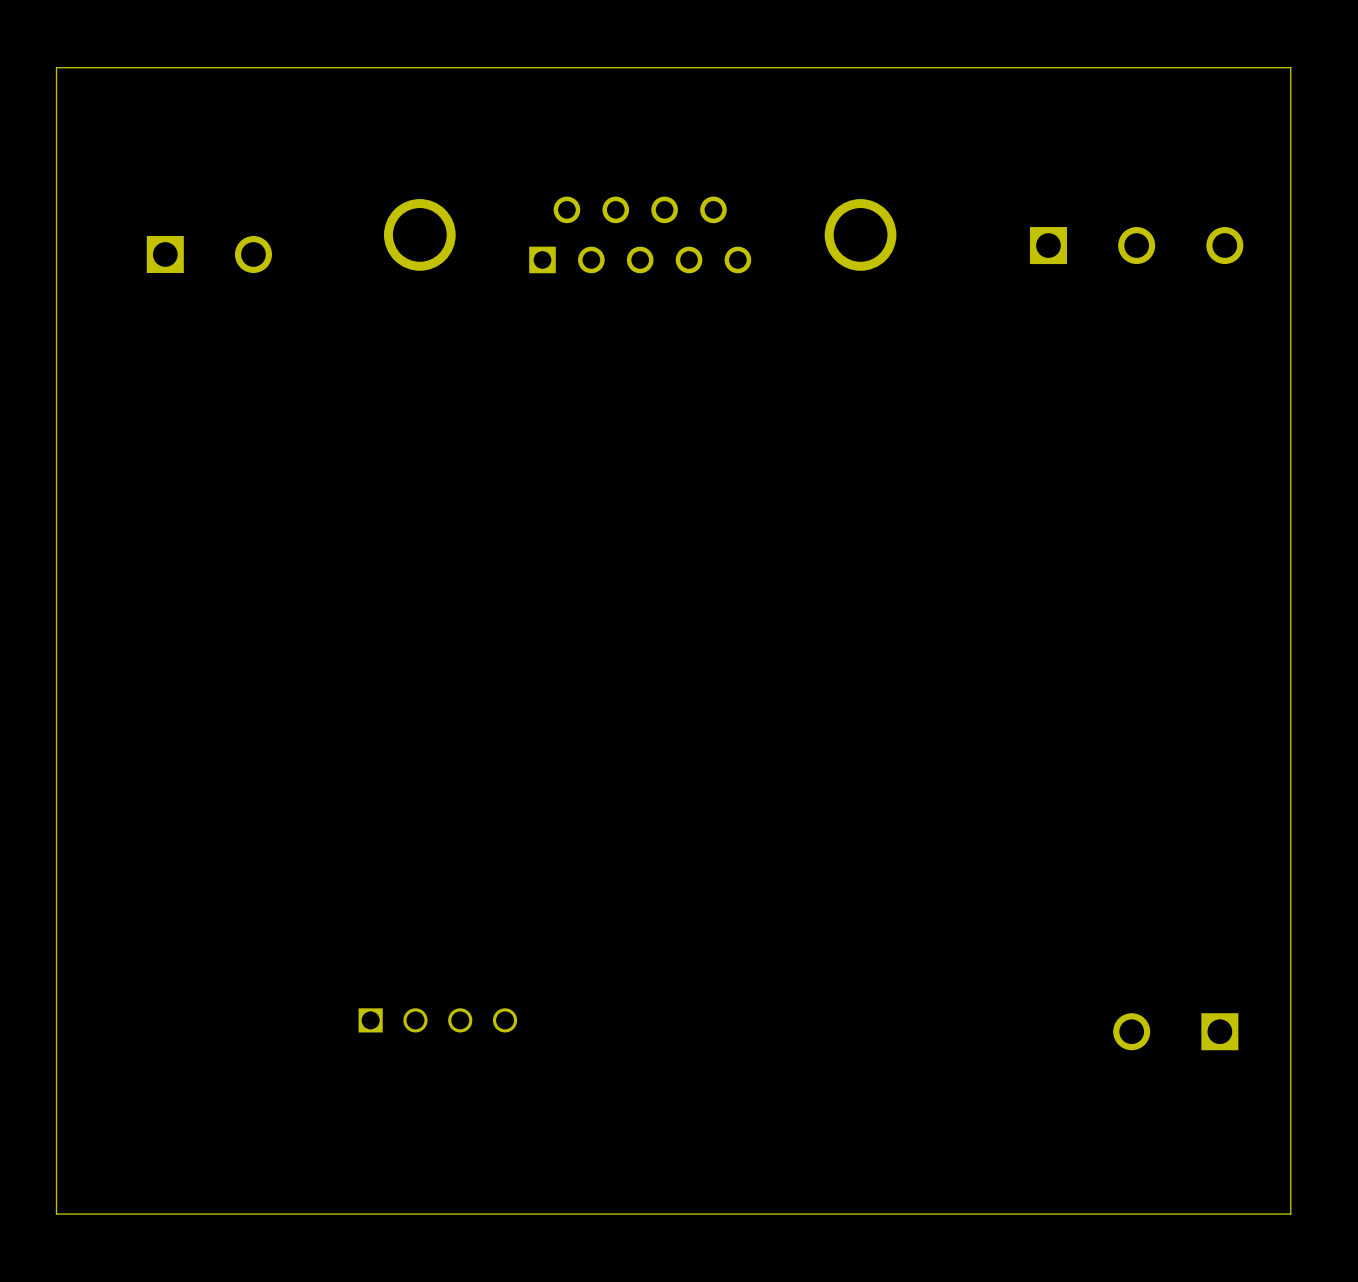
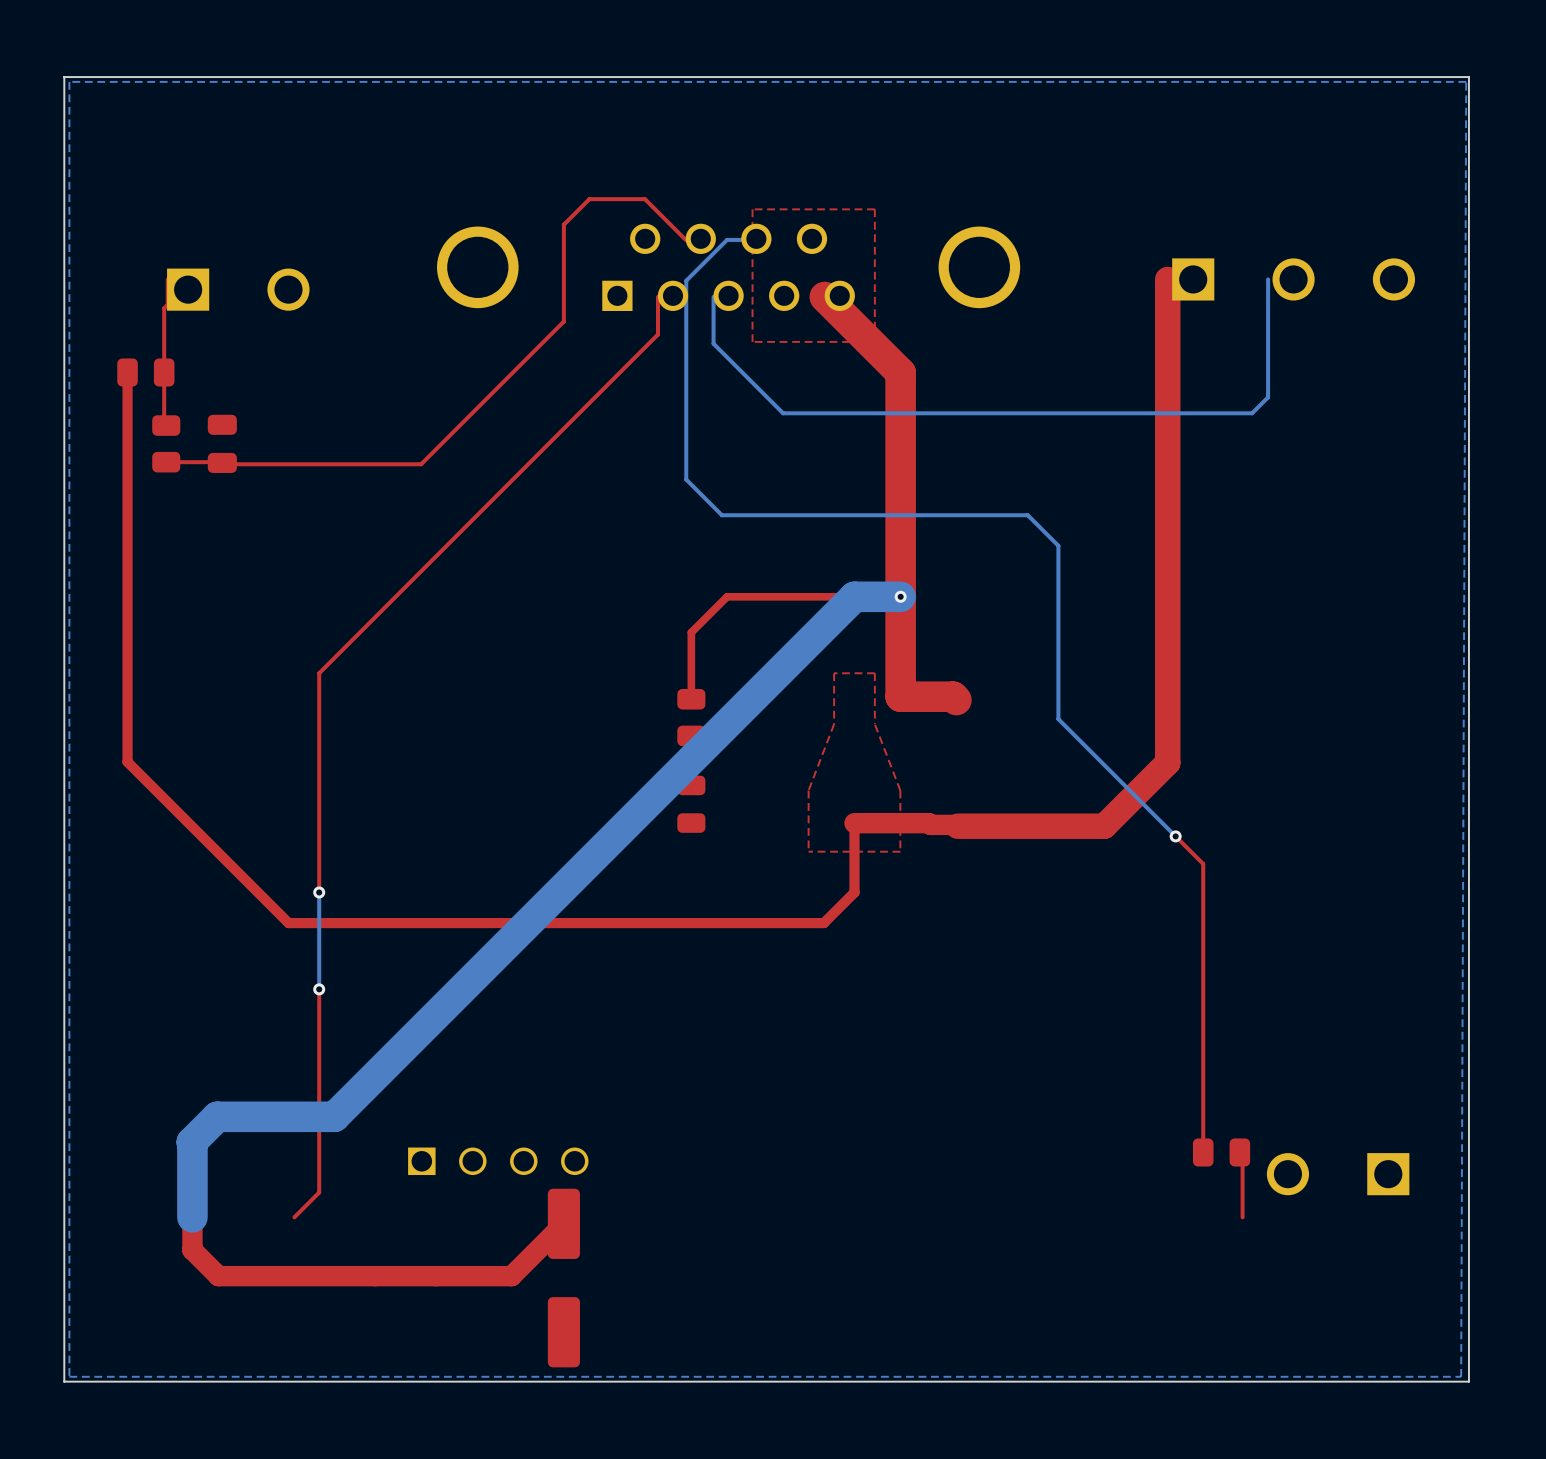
bottom zone outline: none -> (1466, 81) (69, 81) (69, 1376) (1461, 1376) (1466, 81)
top zone outline: none -> (874, 209) (874, 341) (752, 341) (752, 209) (874, 209)
top track: none -> (685, 239) (644, 199) (589, 199) (563, 224) (563, 321) (421, 464) (223, 464) (221, 462) (166, 462)
bottom track: none -> (741, 239) (727, 239) (686, 280) (686, 479) (721, 515) (1027, 515) (1058, 545) (1058, 719) (1175, 836)
top track: none -> (167, 279) (167, 304) (164, 308) (164, 423) (166, 425)
top track: none -> (1167, 279) (1167, 762) (1104, 826) (957, 826) (952, 821)
bottom track: none -> (1268, 279) (1268, 397) (1252, 413) (783, 413) (713, 343) (713, 296)
top track: none -> (657, 296) (657, 334) (319, 673) (319, 892)
top track: none -> (824, 296) (900, 372) (900, 696) (953, 696) (956, 700)
top track: none -> (127, 372) (127, 762) (288, 923) (823, 923) (854, 892) (854, 823) (956, 824)
part: none -> (145, 372)
part: none -> (166, 443)
part: none -> (222, 443)
top track: none -> (900, 596) (727, 596) (691, 632) (691, 699)
bottom track: none -> (900, 596) (854, 596) (334, 1116) (217, 1116) (191, 1142) (192, 1217)
via: none -> (900, 596)
top zone outline: none -> (874, 673) (874, 724) (900, 790) (900, 851) (808, 851) (808, 790) (834, 724) (834, 673) (874, 673)
part: none -> (691, 717)
part: none -> (691, 804)
top track: none -> (1175, 836) (1203, 863) (1203, 1152)
via: none -> (1175, 836)
bottom track: none -> (319, 892) (319, 989)
via: none -> (319, 892)
top track: none -> (319, 989) (319, 1192) (294, 1217)
via: none -> (319, 989)
part: none -> (1221, 1152)
top track: none -> (1239, 1152) (1242, 1155) (1242, 1217)
top track: none -> (192, 1217) (192, 1250) (218, 1276) (511, 1276) (563, 1223)
part: none -> (563, 1278)

